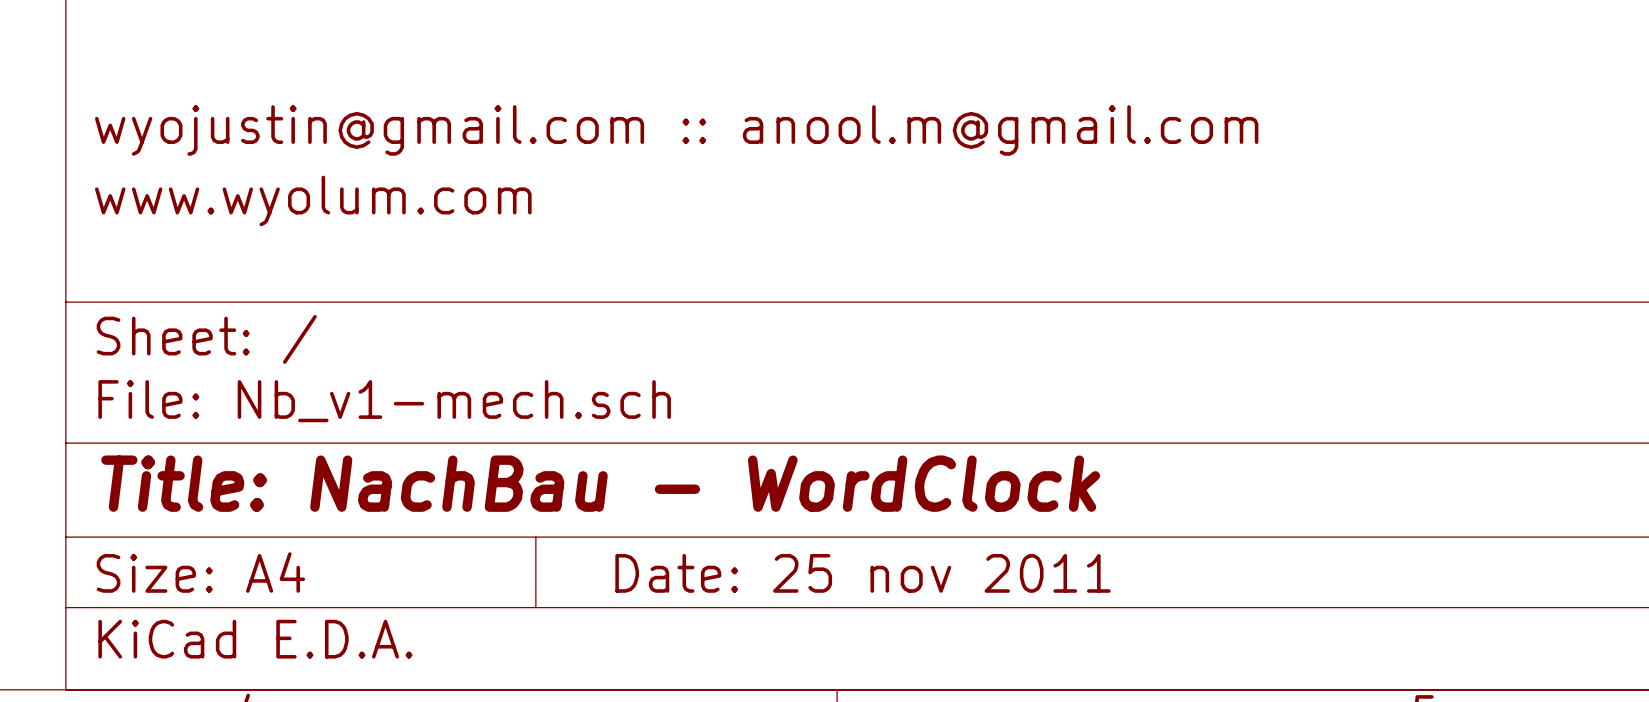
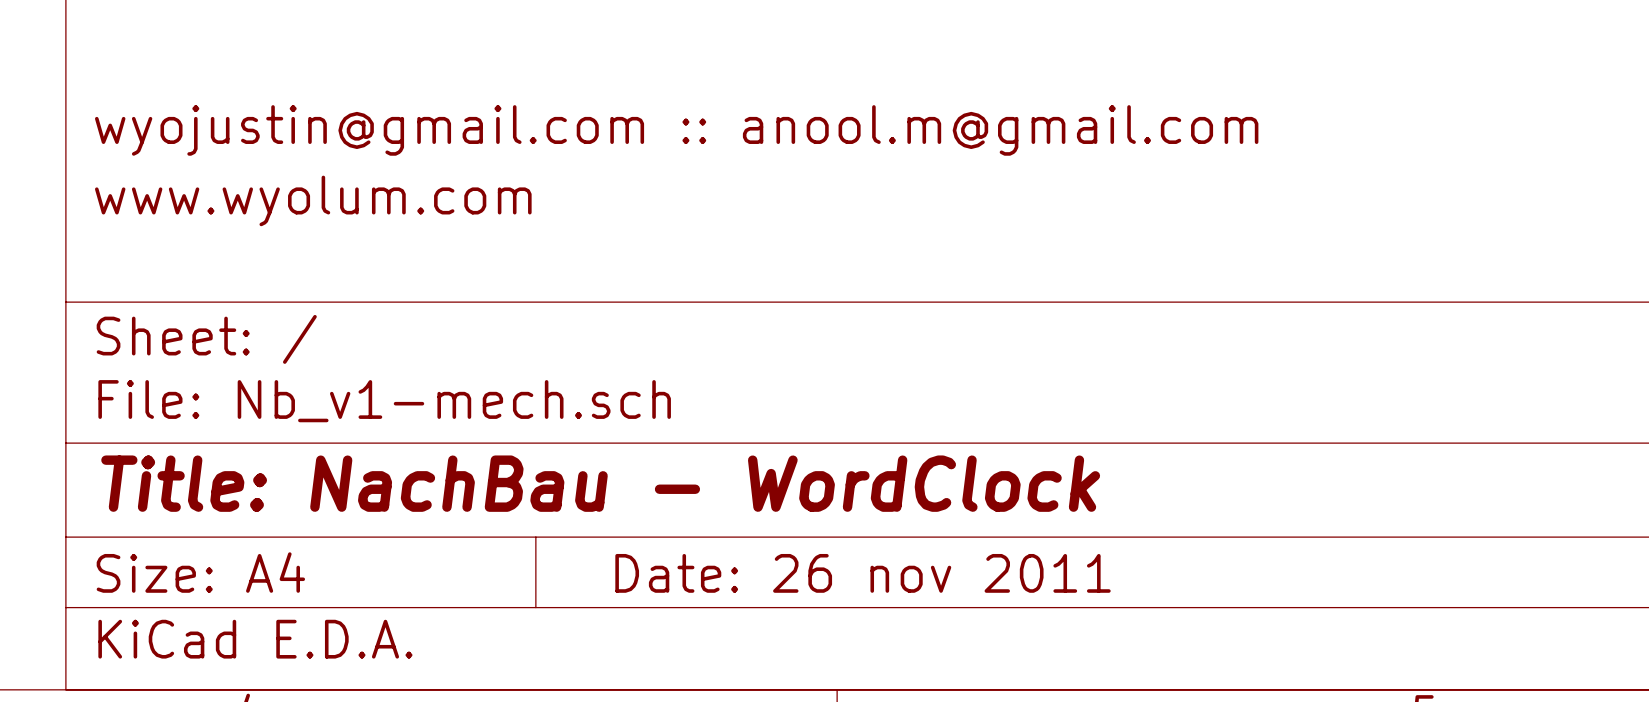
title block: Date: 25 nov 2011 (863, 573) -> Date: 26 nov 2011 (863, 573)

